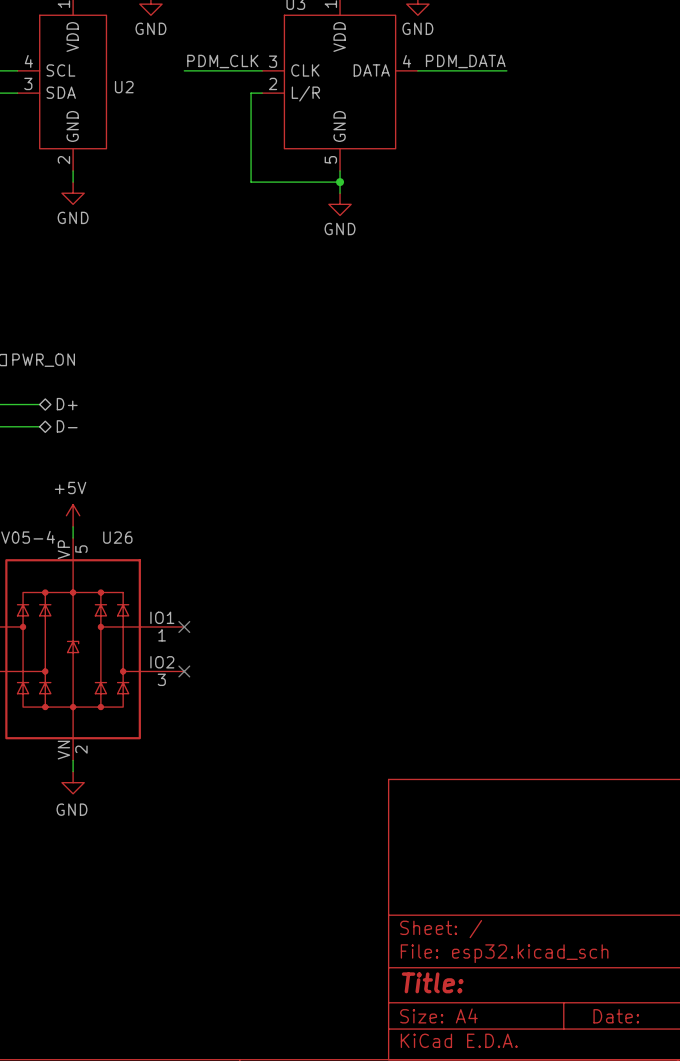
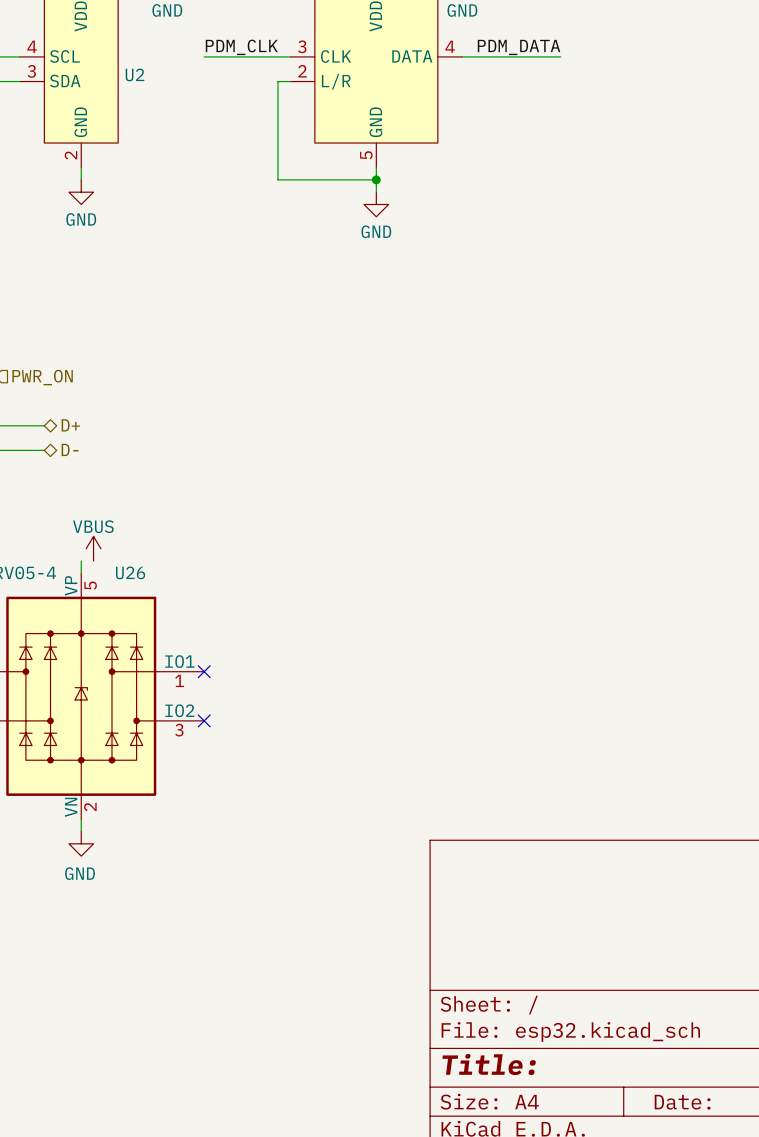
power symbol: +5V (73, 515) -> none
power symbol: none -> VBUS (93, 548)

